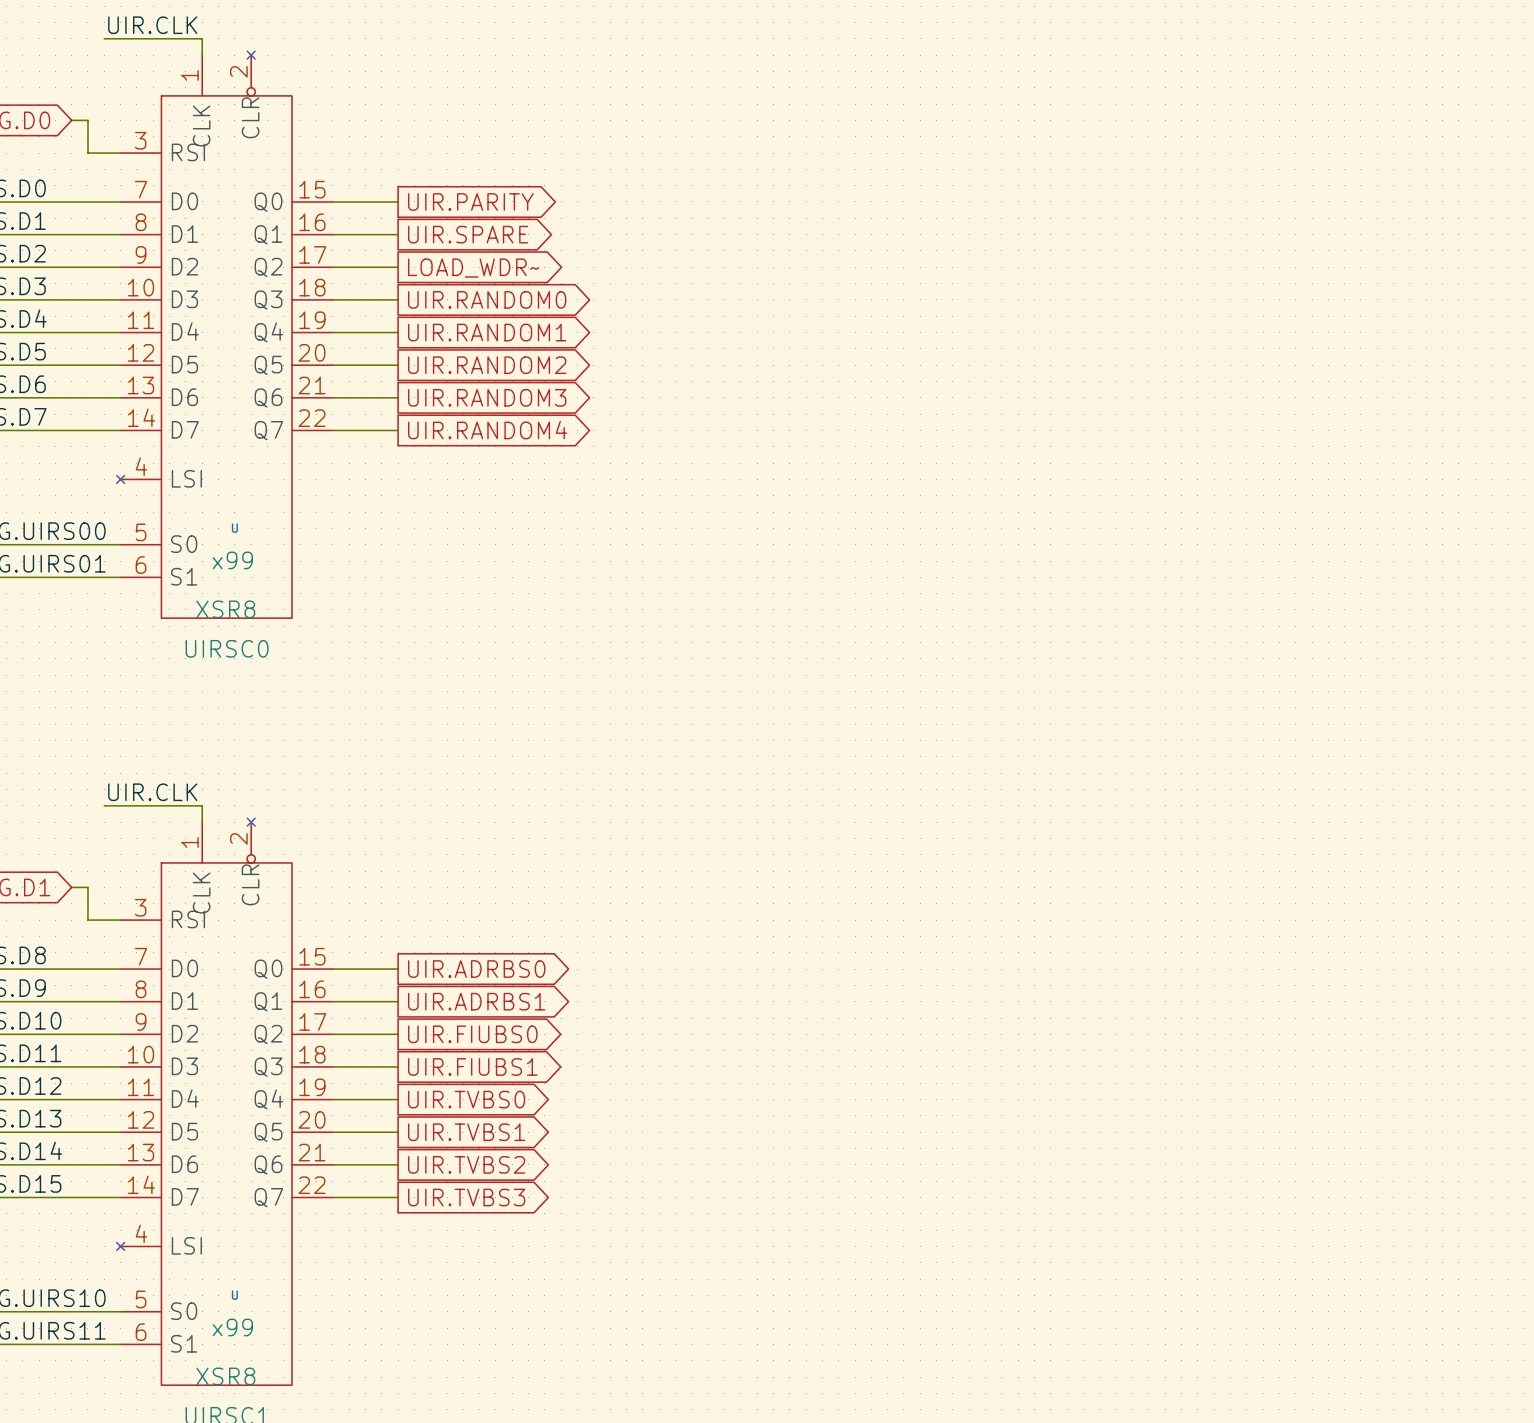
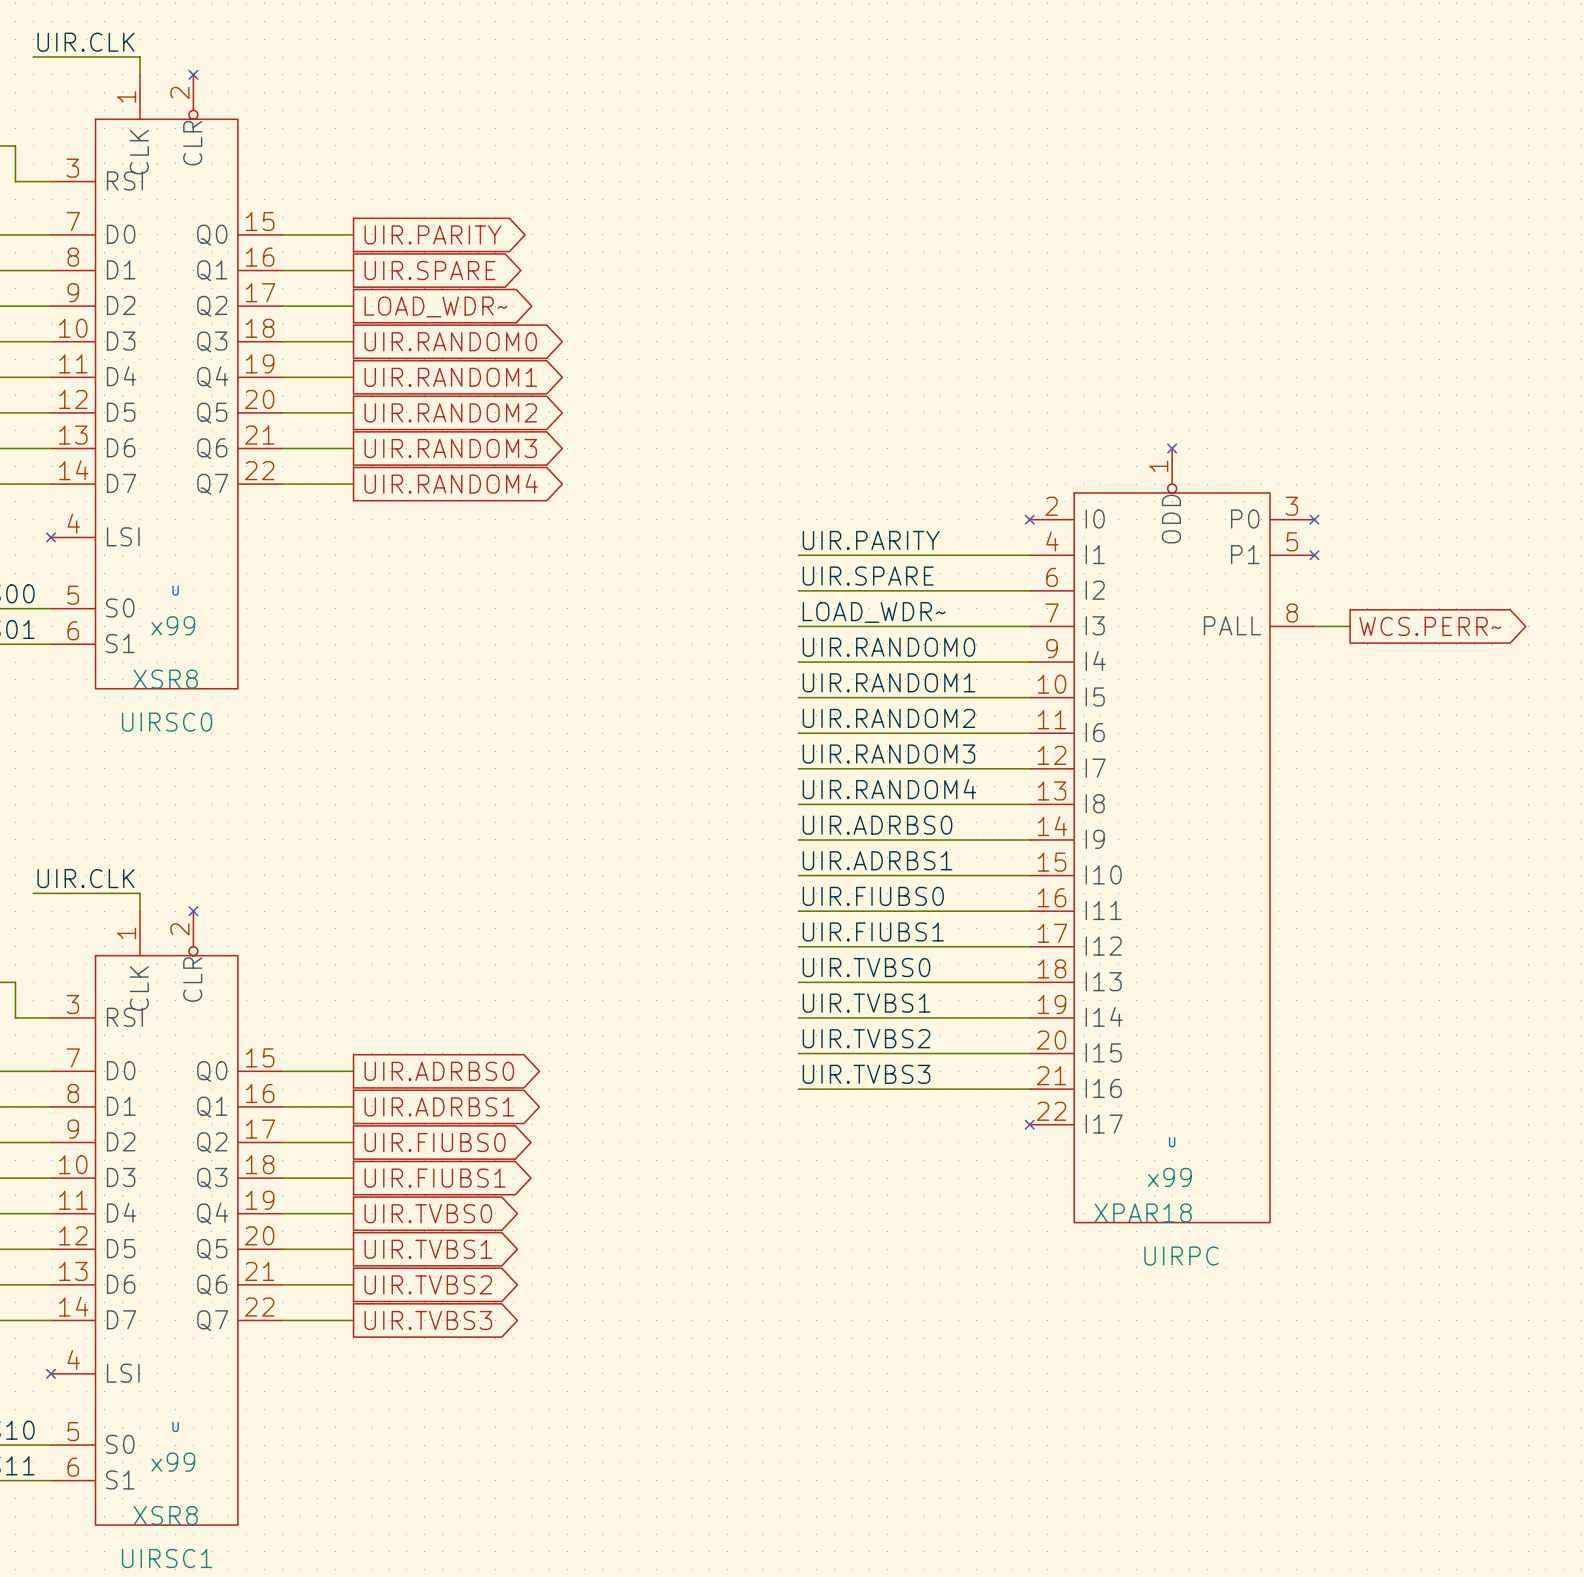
no-connect mark: none -> (1172, 448)
no-connect mark: none -> (1029, 519)
no-connect mark: none -> (1314, 519)
label: none -> UIR.PARITY (871, 540)
wire: none -> (798, 555) (1029, 555)
no-connect mark: none -> (1314, 555)
label: none -> UIR.SPARE (868, 576)
wire: none -> (798, 590) (1029, 590)
label: none -> LOAD_WDR~ (874, 612)
wire: none -> (798, 626) (1029, 626)
wire: none -> (1314, 626) (1350, 626)
global label: none -> WCS.PERR~ (1430, 626)
label: none -> UIR.RANDOM0 (888, 647)
wire: none -> (798, 662) (1029, 662)
label: none -> UIR.RANDOM1 (888, 682)
wire: none -> (798, 697) (1029, 697)
label: none -> UIR.RANDOM2 (888, 718)
wire: none -> (798, 733) (1029, 733)
label: none -> UIR.RANDOM3 (888, 754)
wire: none -> (798, 768) (1029, 768)
label: none -> UIR.RANDOM4 (889, 789)
wire: none -> (798, 804) (1029, 804)
label: none -> UIR.ADRBS0 (877, 825)
U: none -> XPAR18 (1172, 835)
wire: none -> (798, 839) (1029, 839)
label: none -> UIR.ADRBS1 (877, 860)
wire: none -> (798, 875) (1029, 875)
label: none -> UIR.FIUBS0 (873, 896)
wire: none -> (798, 911) (1029, 911)
label: none -> UIR.FIUBS1 (873, 931)
wire: none -> (798, 946) (1029, 946)
label: none -> UIR.TVBS0 (866, 967)
wire: none -> (798, 982) (1029, 982)
label: none -> UIR.TVBS1 (866, 1003)
wire: none -> (798, 1017) (1029, 1017)
label: none -> UIR.TVBS2 (866, 1038)
wire: none -> (798, 1053) (1029, 1053)
label: none -> UIR.TVBS3 (866, 1074)
wire: none -> (798, 1089) (1029, 1089)
no-connect mark: none -> (1029, 1124)

